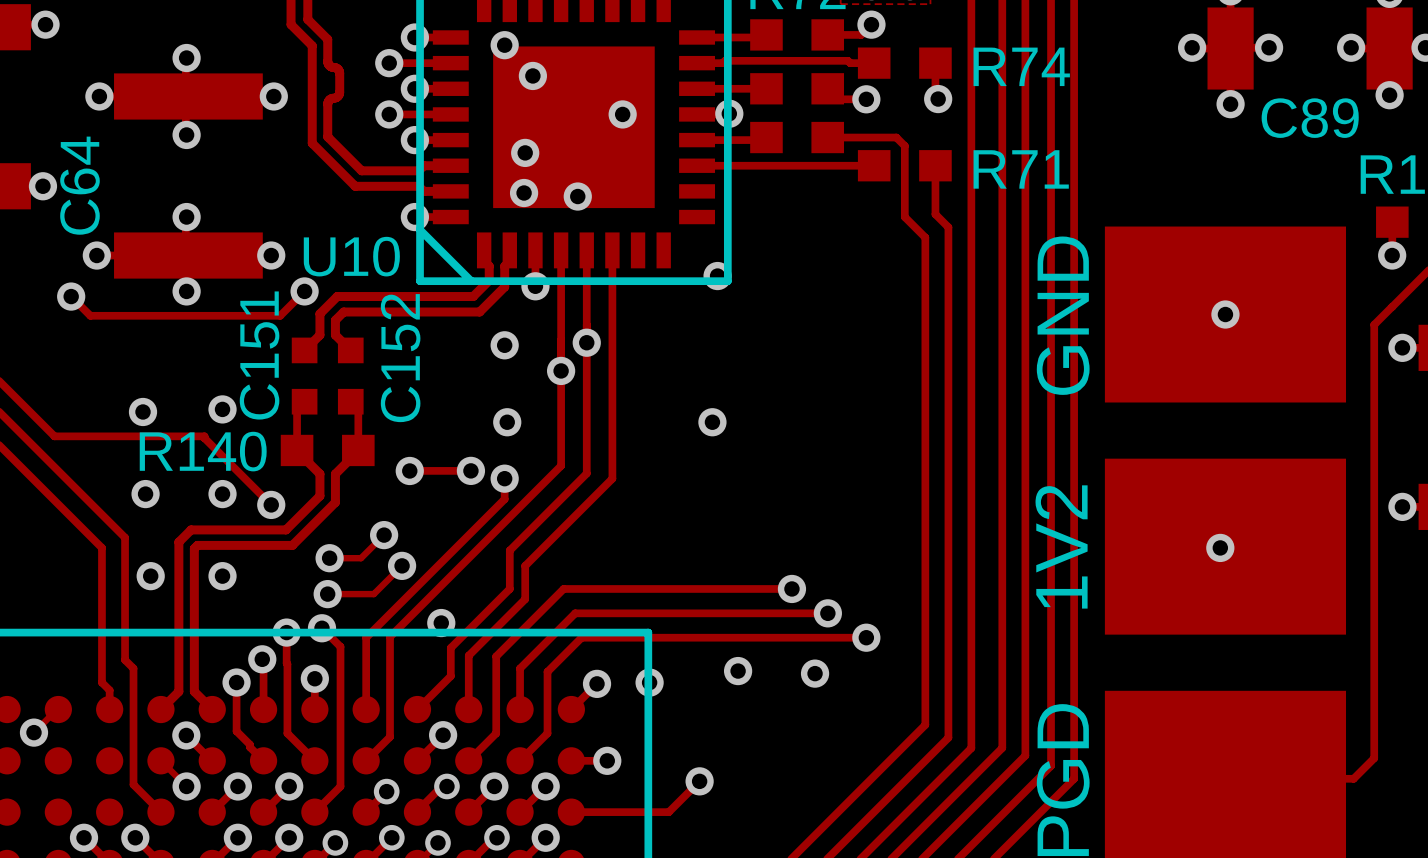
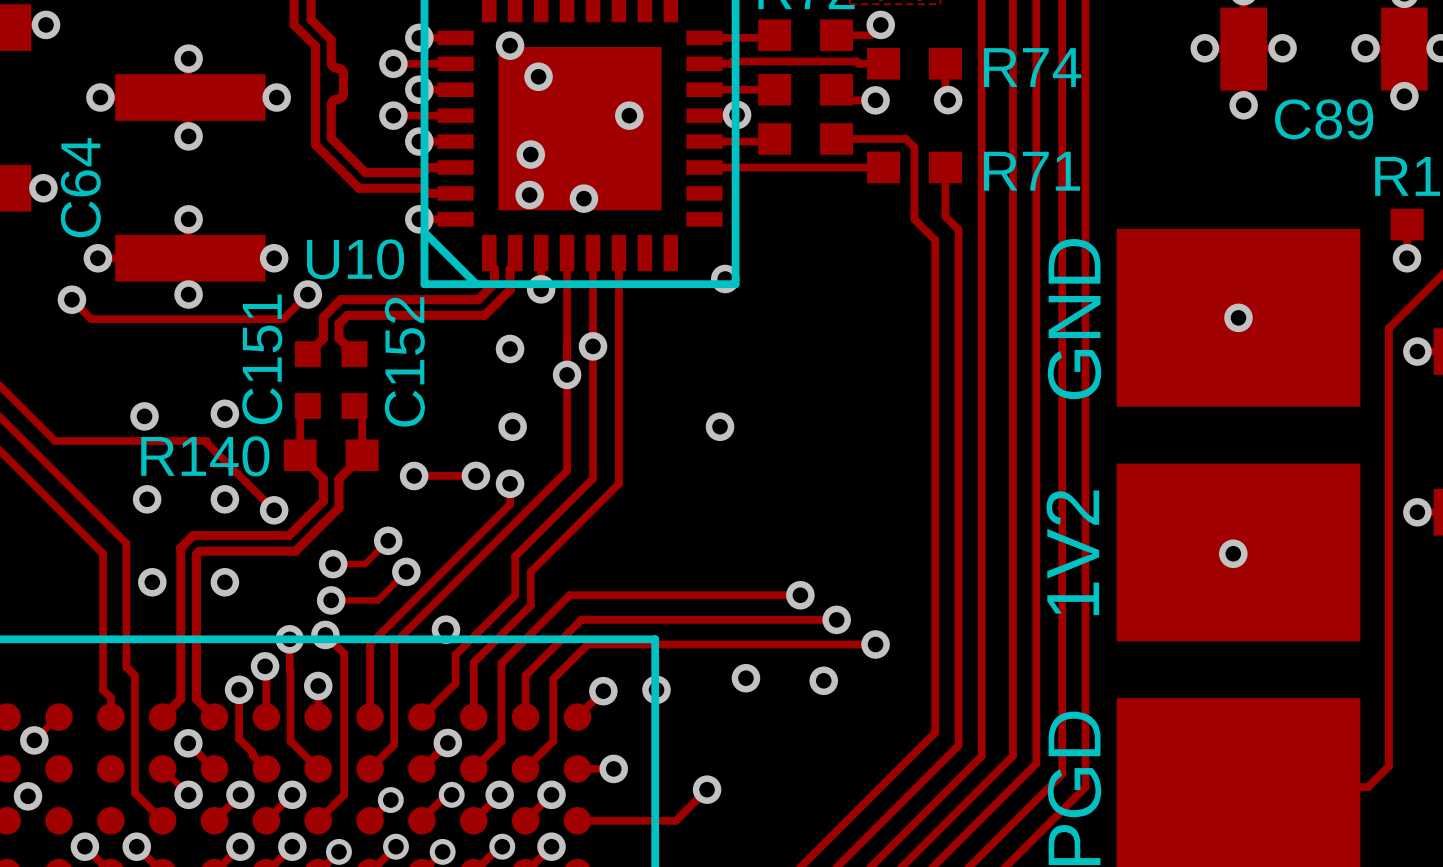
via: none -> (28, 796)

